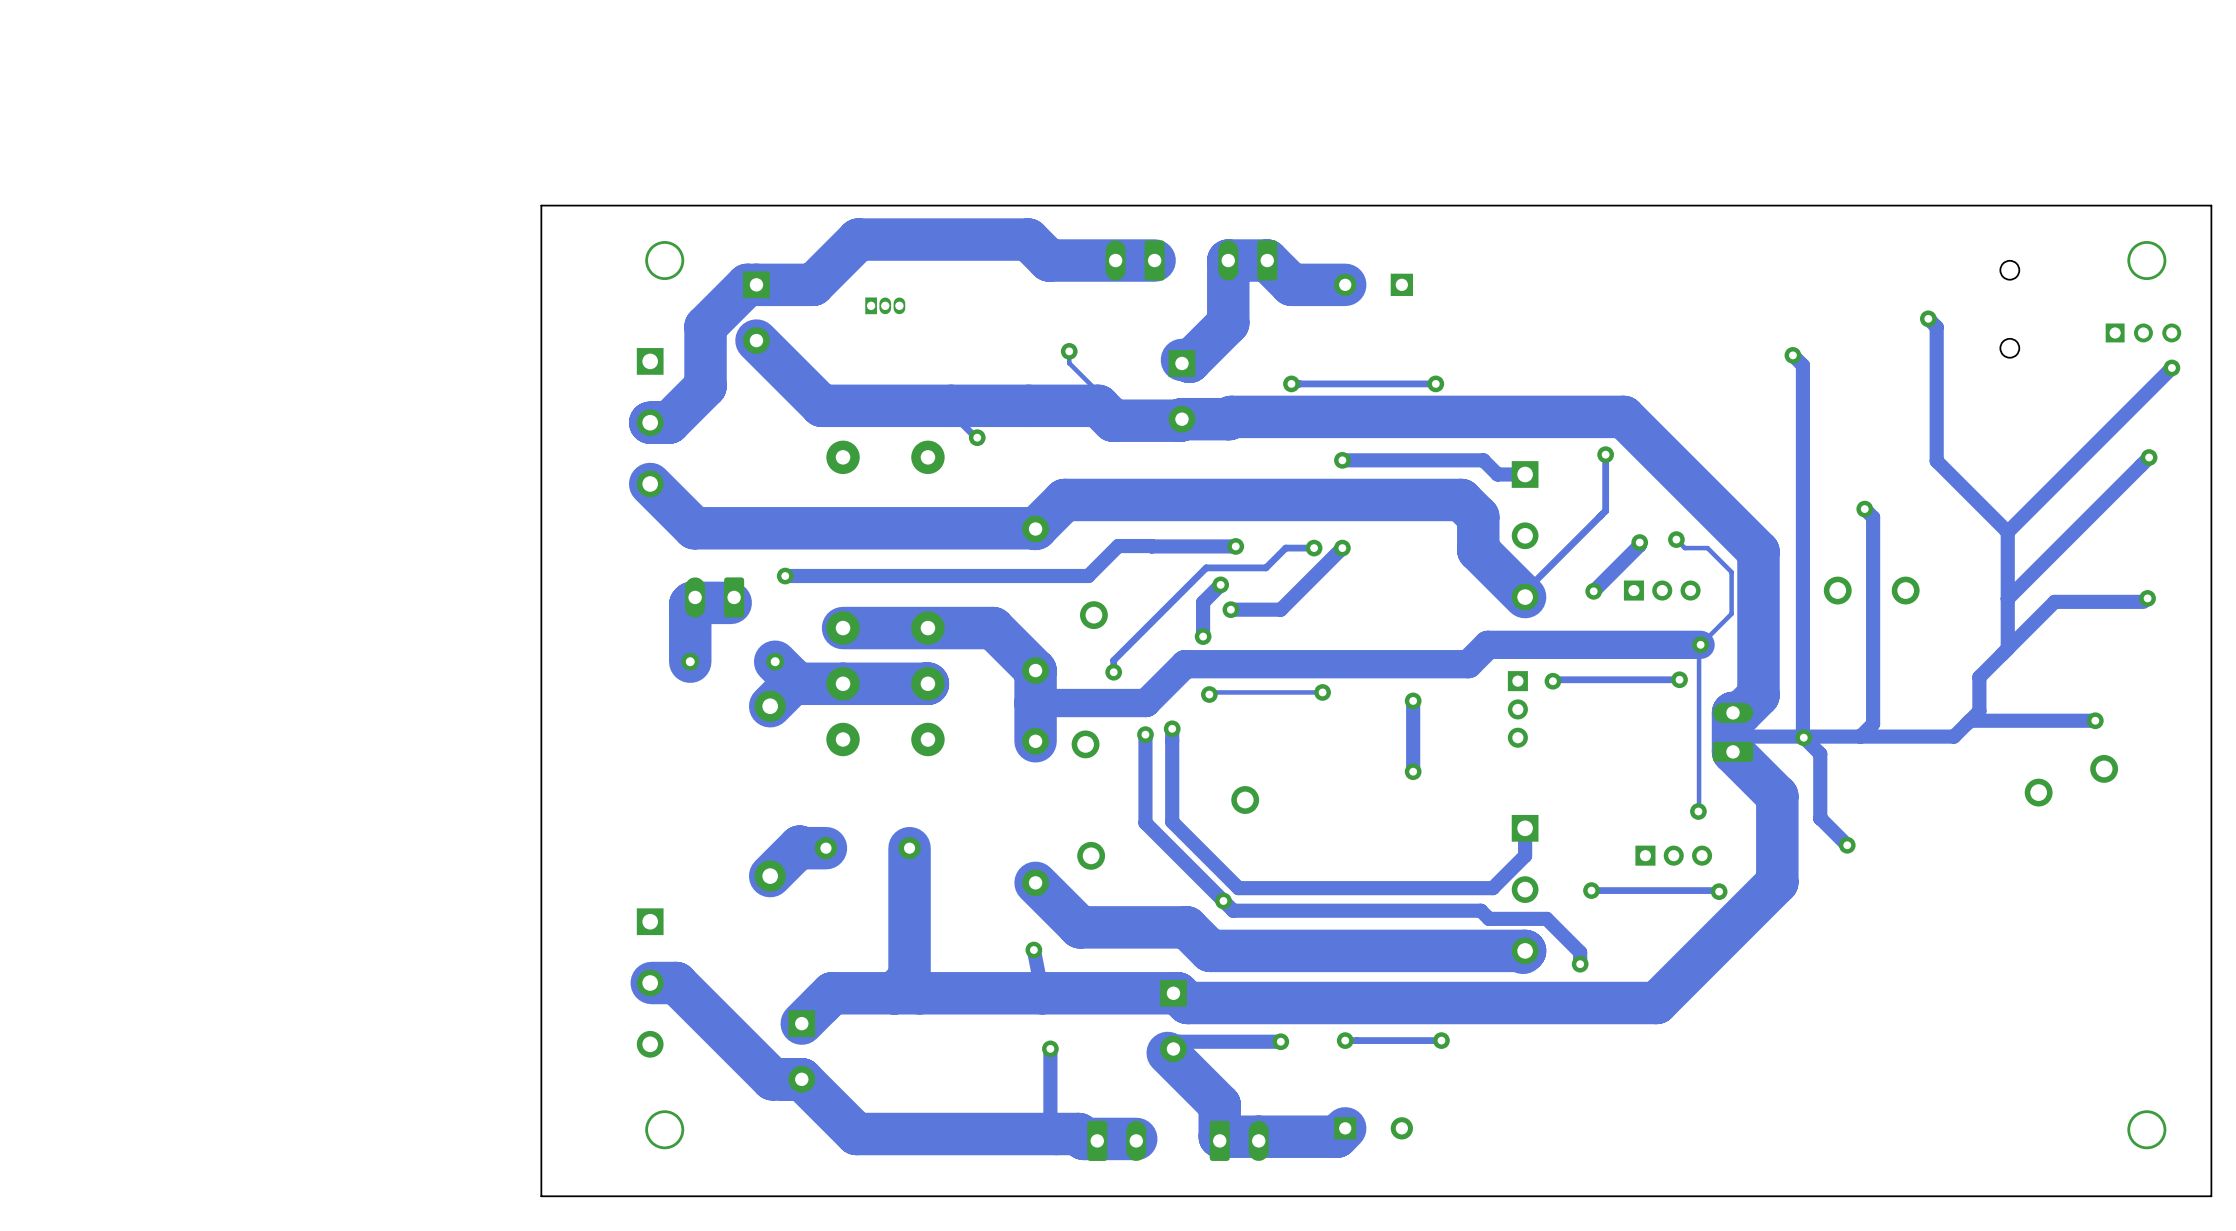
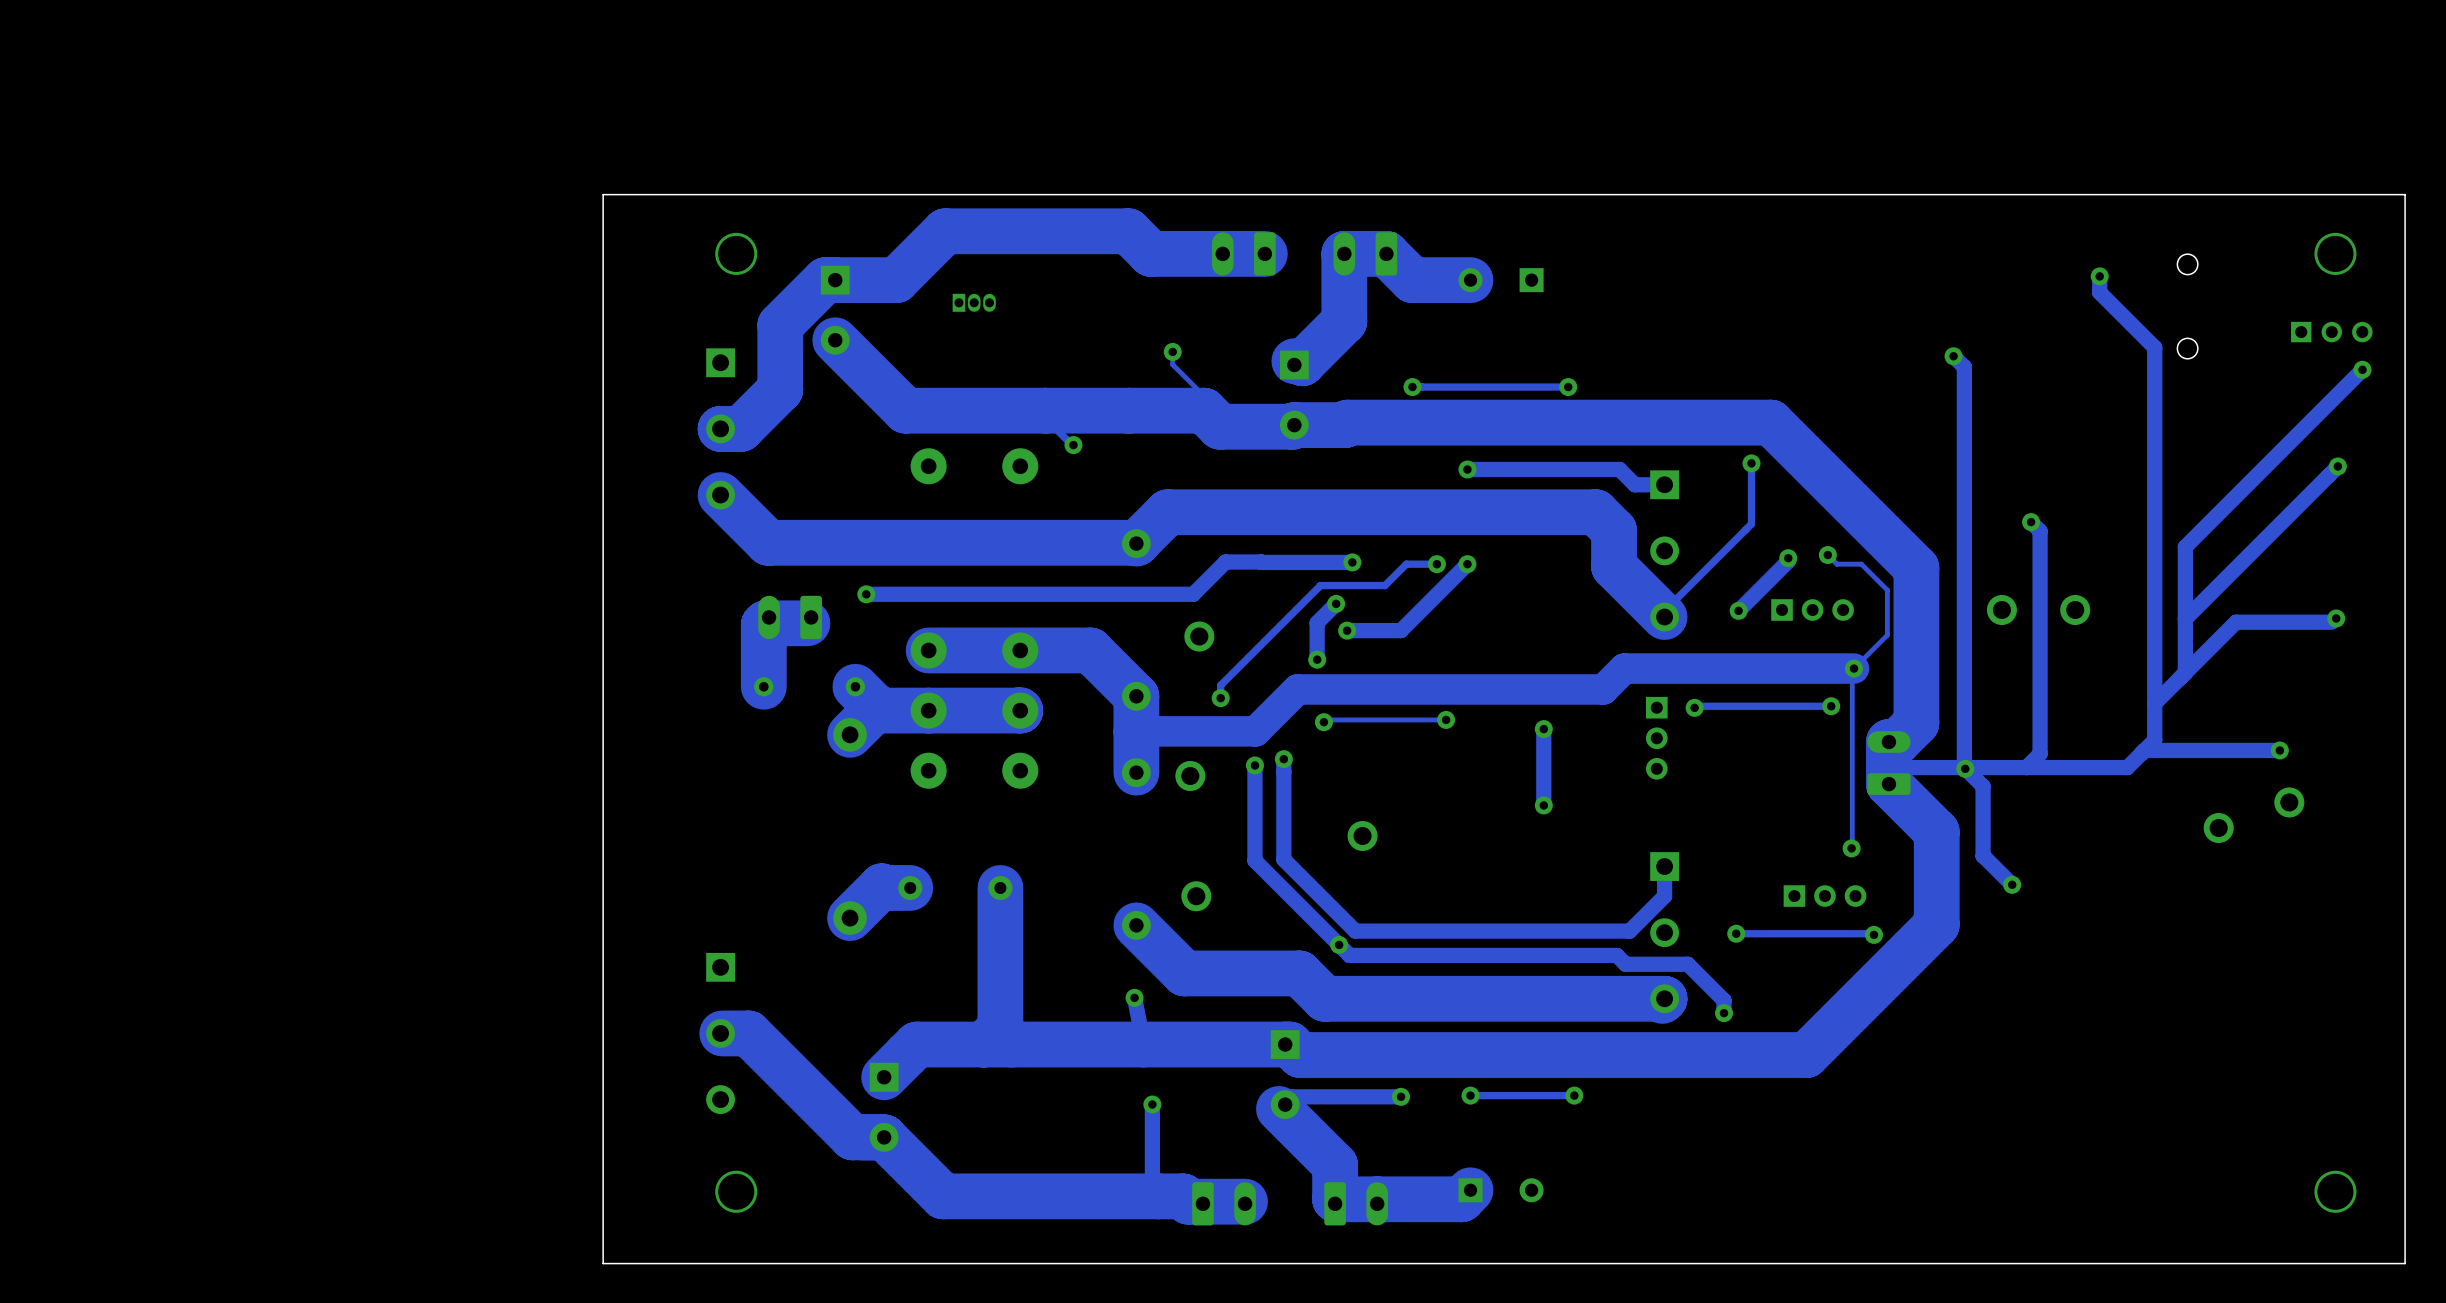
track: none -> (2099, 276) (2099, 292) (2154, 347) (2154, 703)
track: (1928, 318) (1936, 327) (1936, 461) (2007, 532) -> none
via position: (1928, 318) -> (2099, 276)

